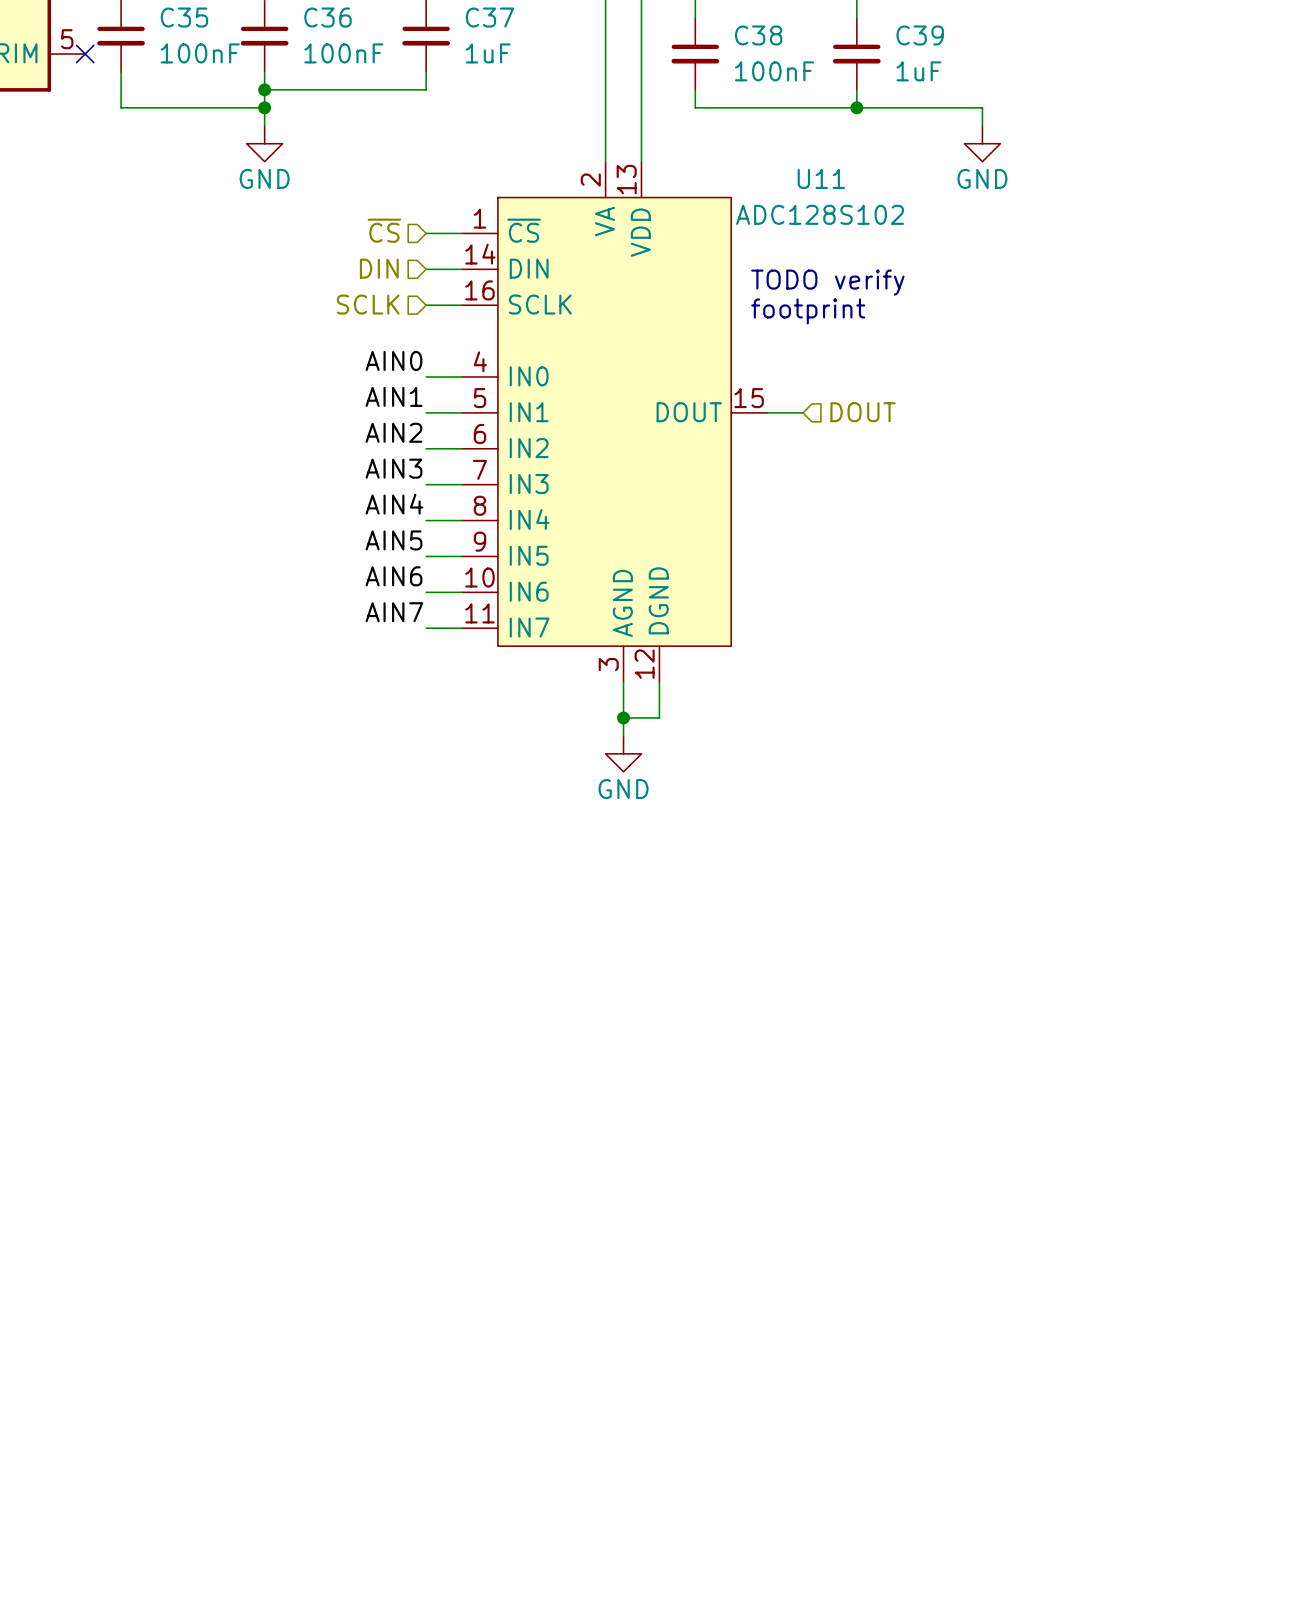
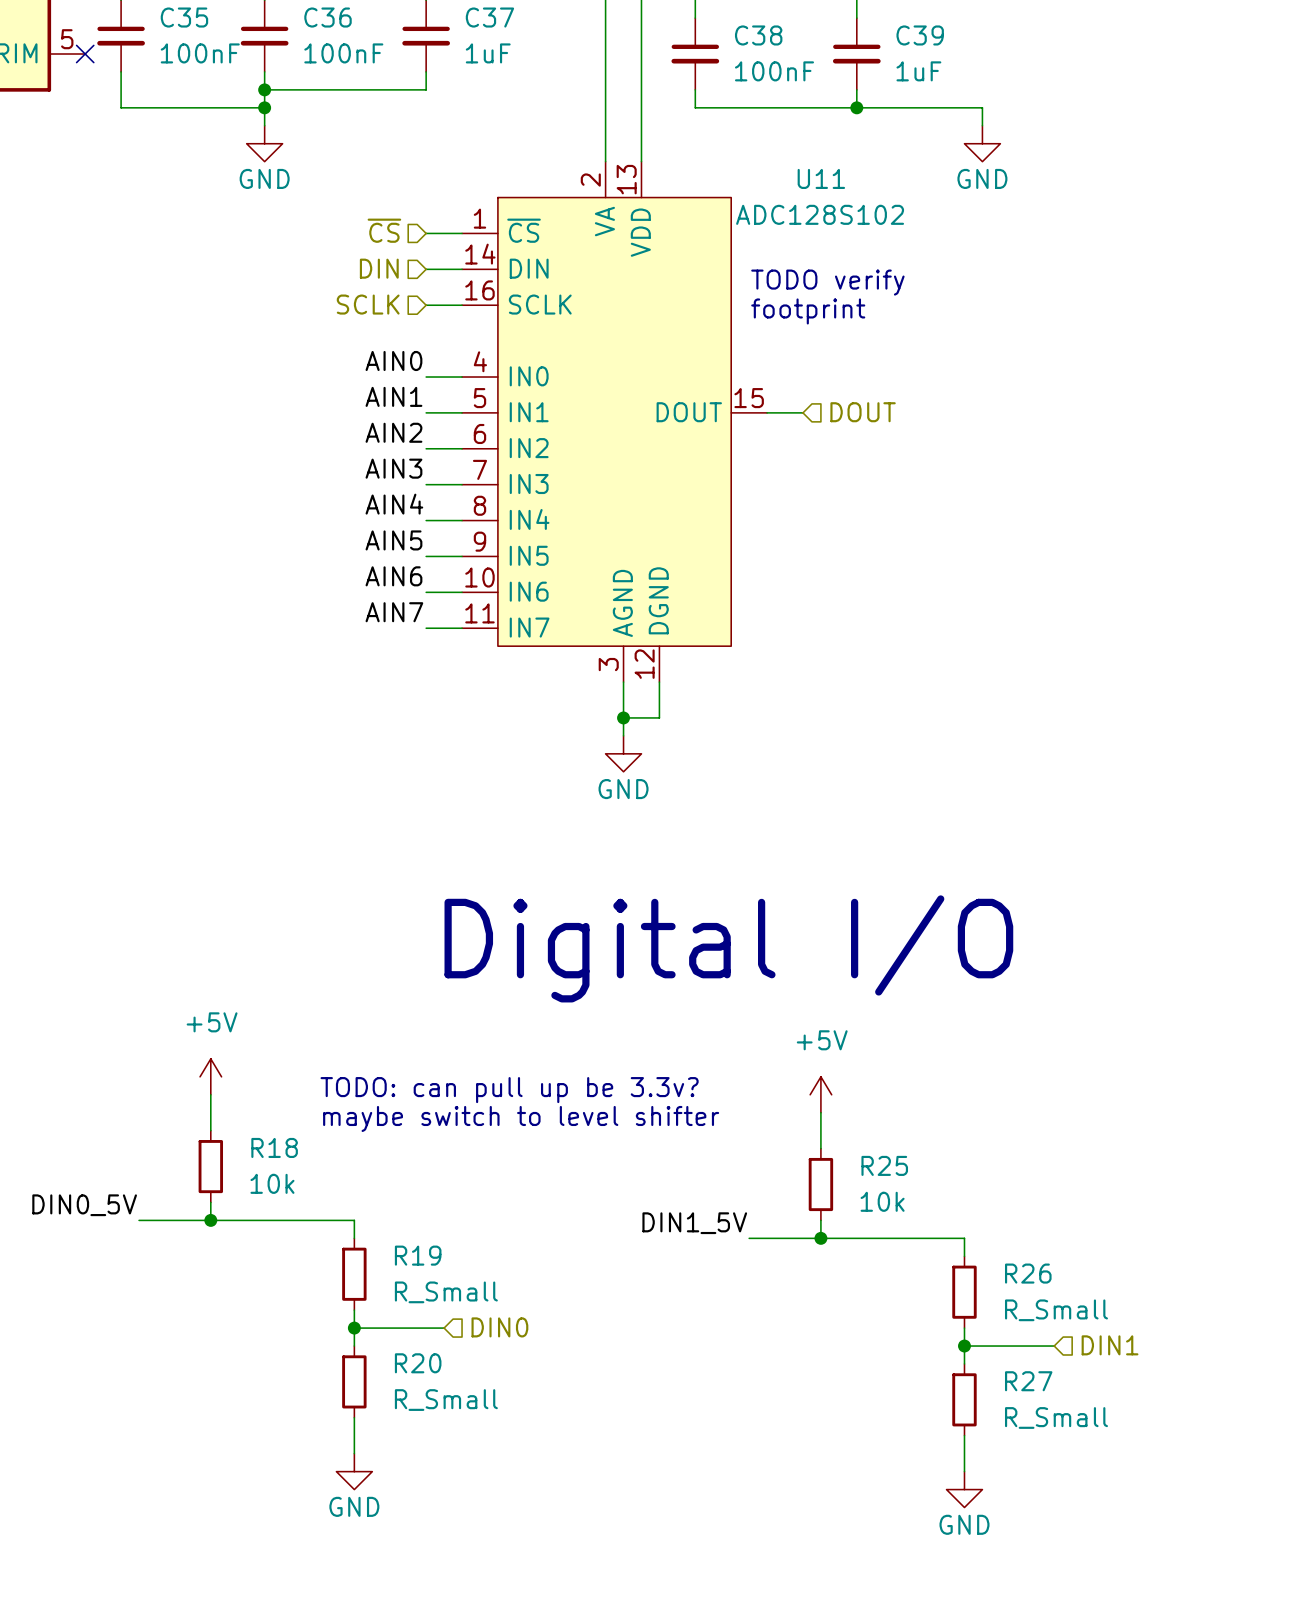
text: none -> Digital I/O (728, 948)
power symbol: none -> +5V (210, 1076)
text: none -> TODO: can pull up be 3.3v? (509, 1090)
wire: none -> (210, 1094) (210, 1130)
power symbol: none -> +5V (820, 1094)
wire: none -> (820, 1112) (820, 1148)
text: none -> maybe switch to level shifter (521, 1118)
R18: none -> 10k (210, 1166)
R25: none -> 10k (820, 1184)
wire: none -> (210, 1202) (210, 1220)
label: none -> DIN0_5V (84, 1205)
wire: none -> (139, 1220) (354, 1220) (354, 1238)
junction: none -> (210, 1220)
wire: none -> (820, 1220) (820, 1238)
label: none -> DIN1_5V (694, 1223)
wire: none -> (749, 1238) (964, 1238) (964, 1256)
junction: none -> (820, 1238)
R19: none -> R_Small (354, 1274)
R26: none -> R_Small (964, 1292)
wire: none -> (354, 1310) (354, 1346)
hierarchical label: none -> DIN0 (499, 1327)
wire: none -> (354, 1328) (444, 1328)
junction: none -> (354, 1328)
wire: none -> (964, 1328) (964, 1363)
hierarchical label: none -> DIN1 (1110, 1345)
wire: none -> (964, 1346) (1054, 1346)
junction: none -> (964, 1346)
R20: none -> R_Small (354, 1381)
R27: none -> R_Small (964, 1399)
wire: none -> (354, 1417) (354, 1453)
wire: none -> (964, 1435) (964, 1471)
power symbol: none -> GND (354, 1471)
power symbol: none -> GND (964, 1489)

